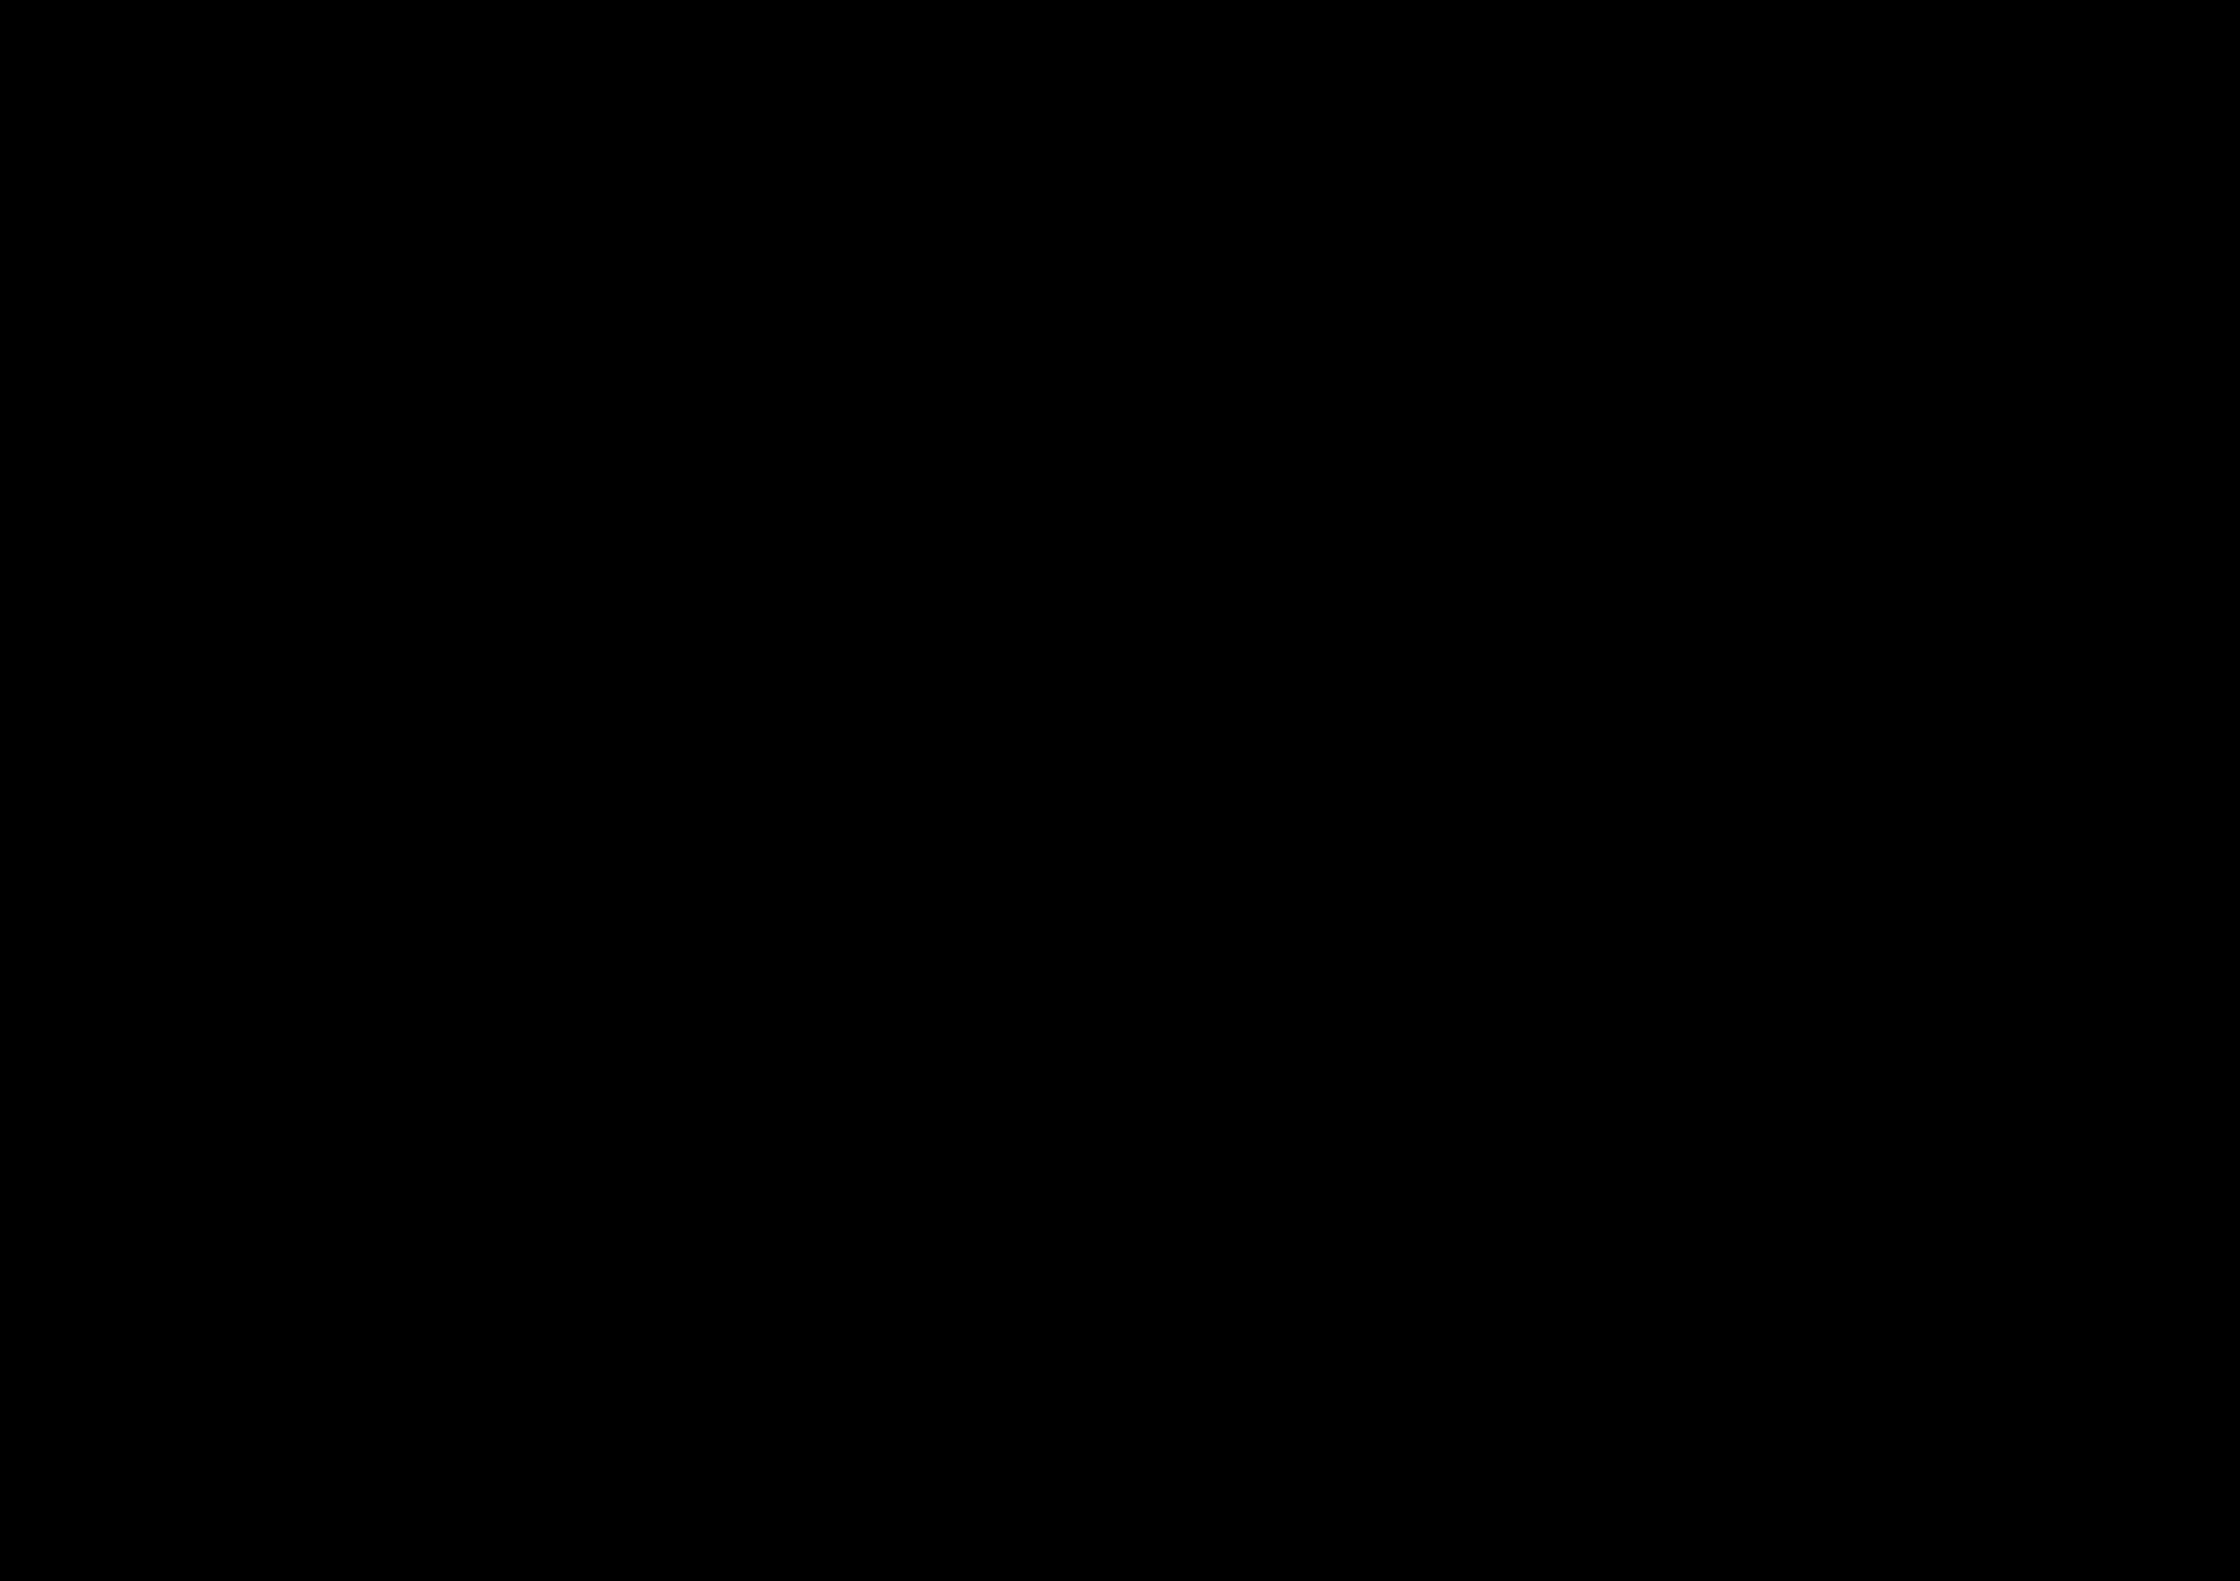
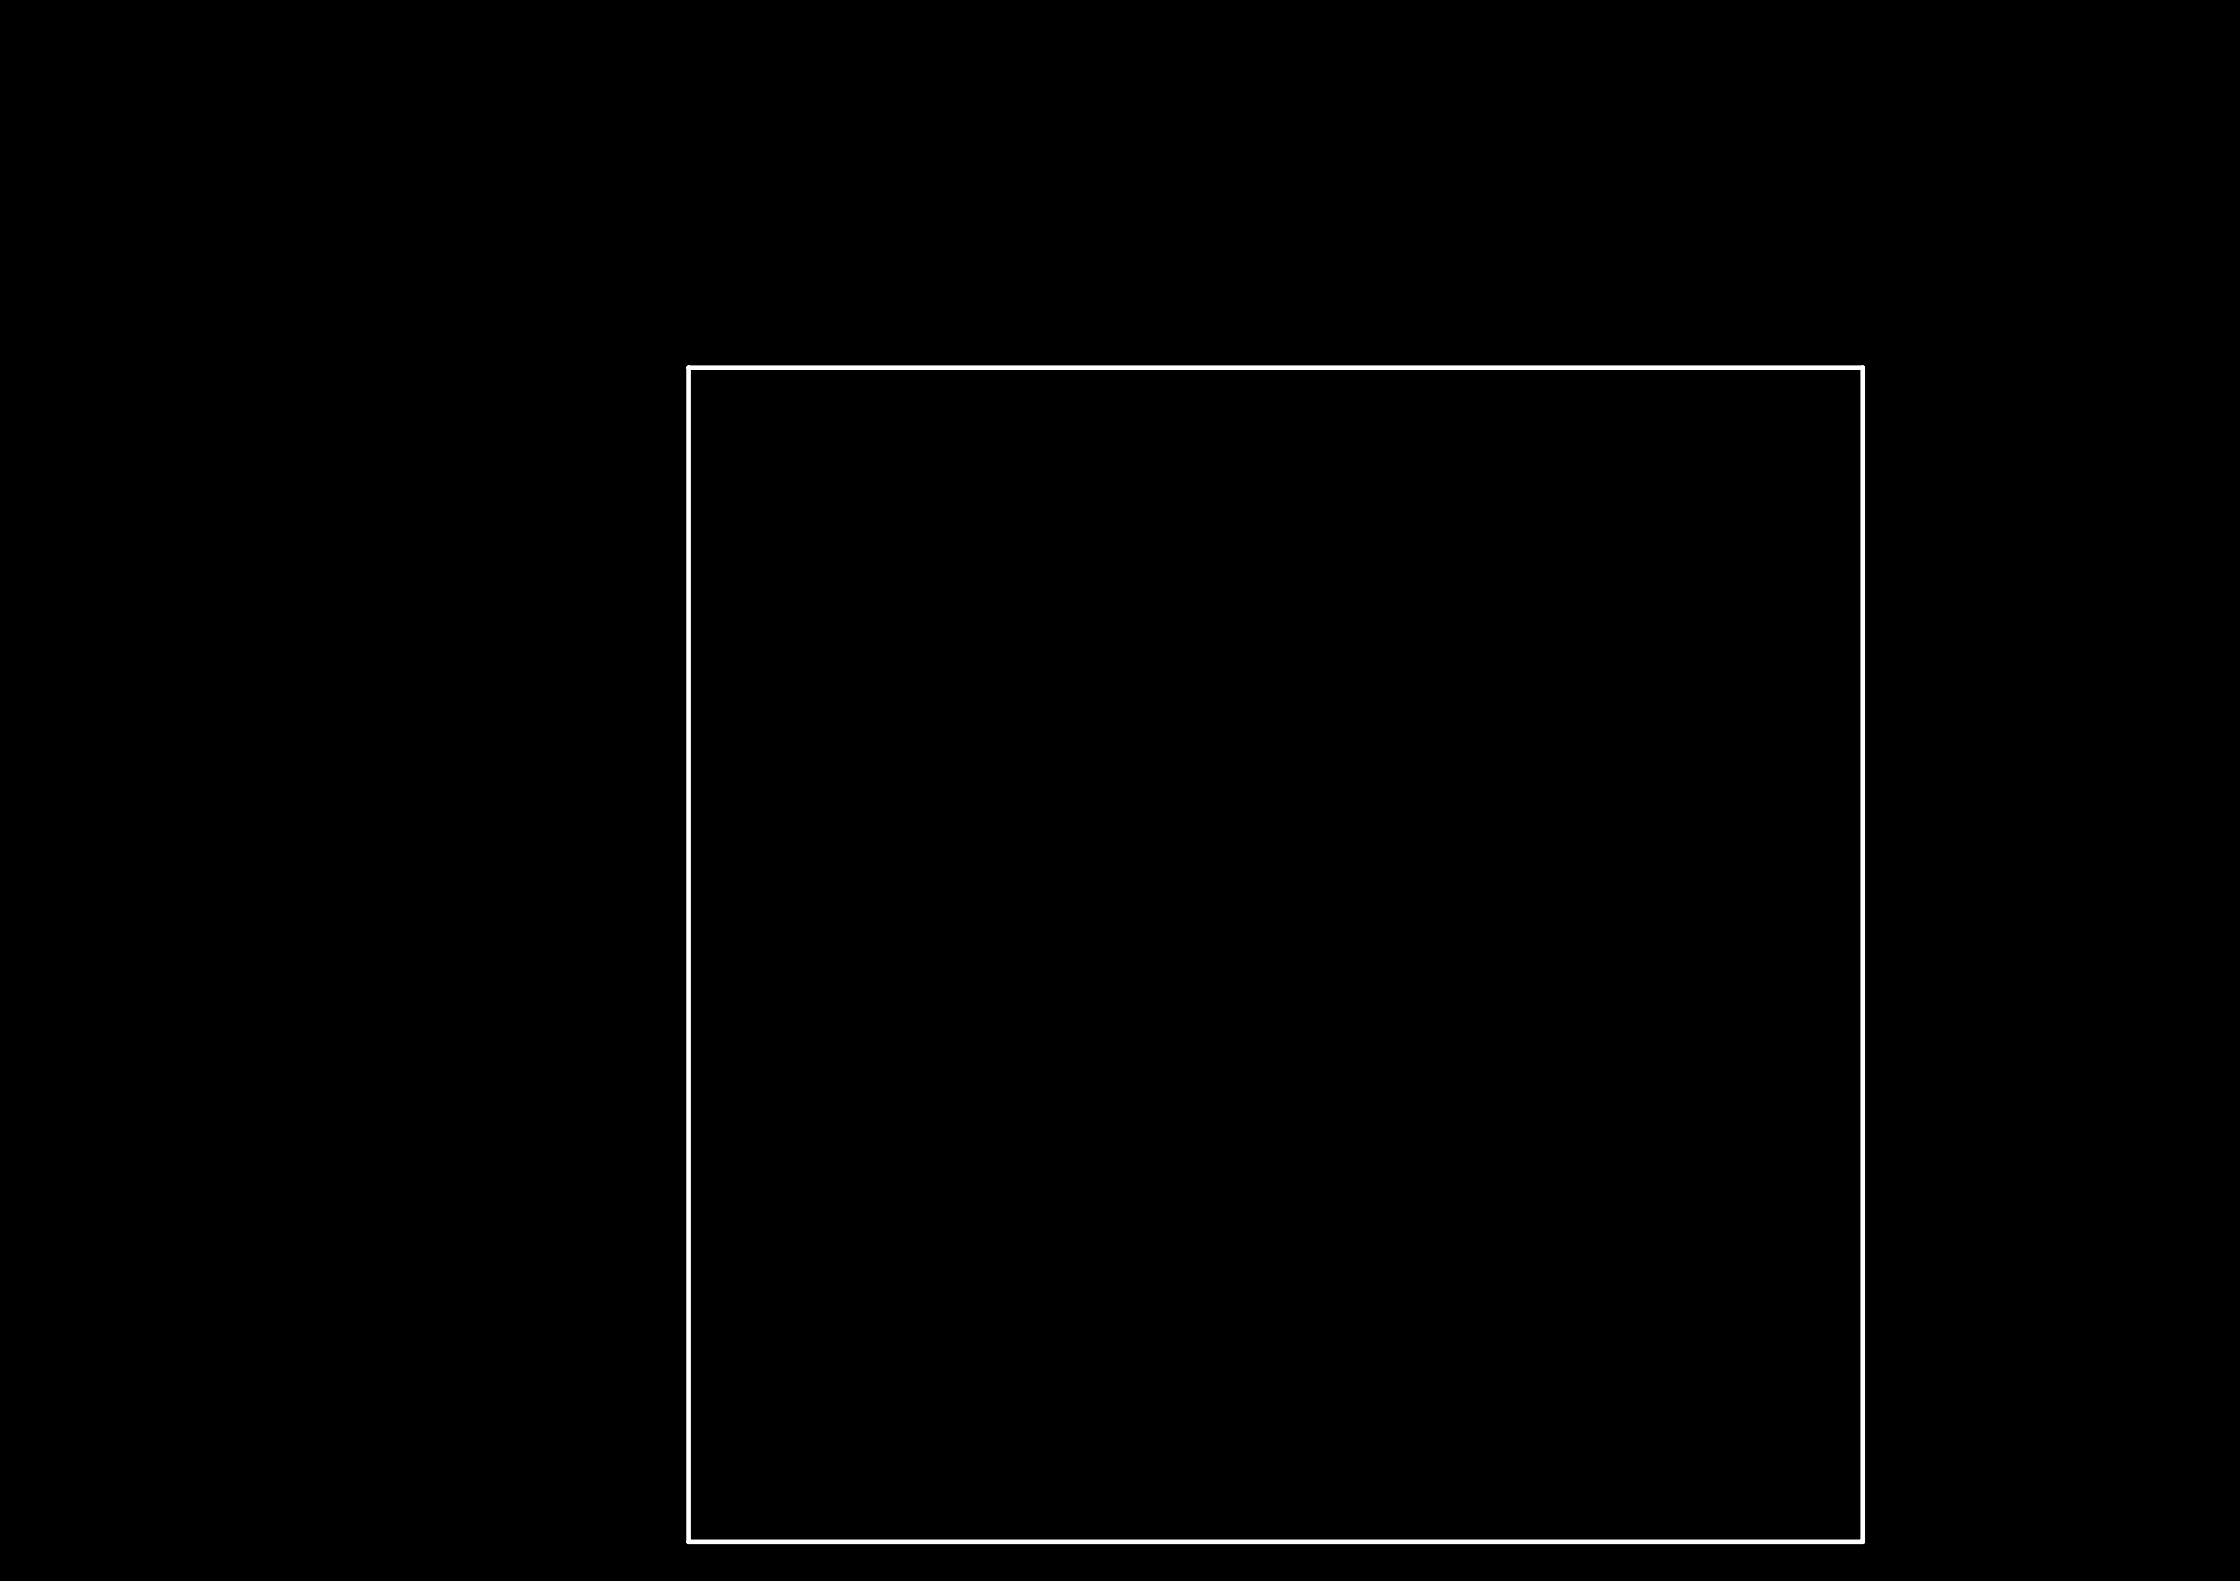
board edge: none -> (688, 367) (1862, 367) (1862, 1541) (688, 1541) (688, 367)

